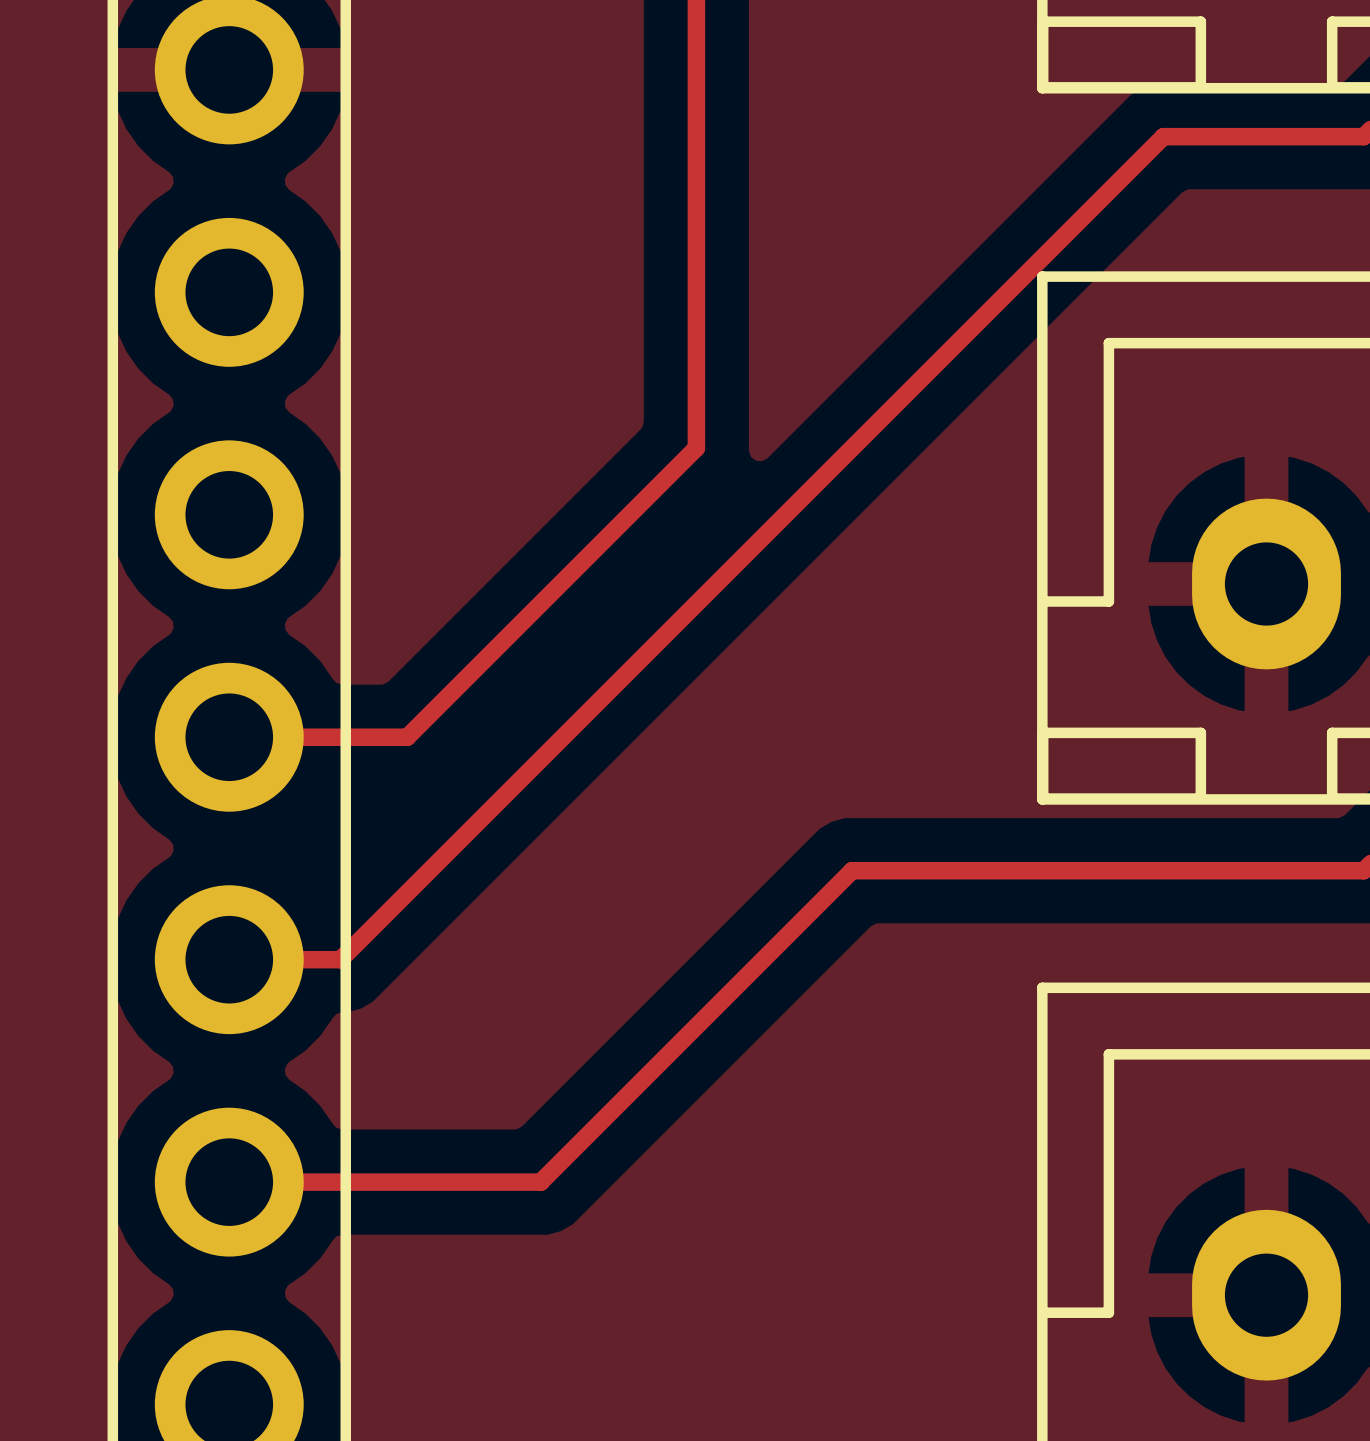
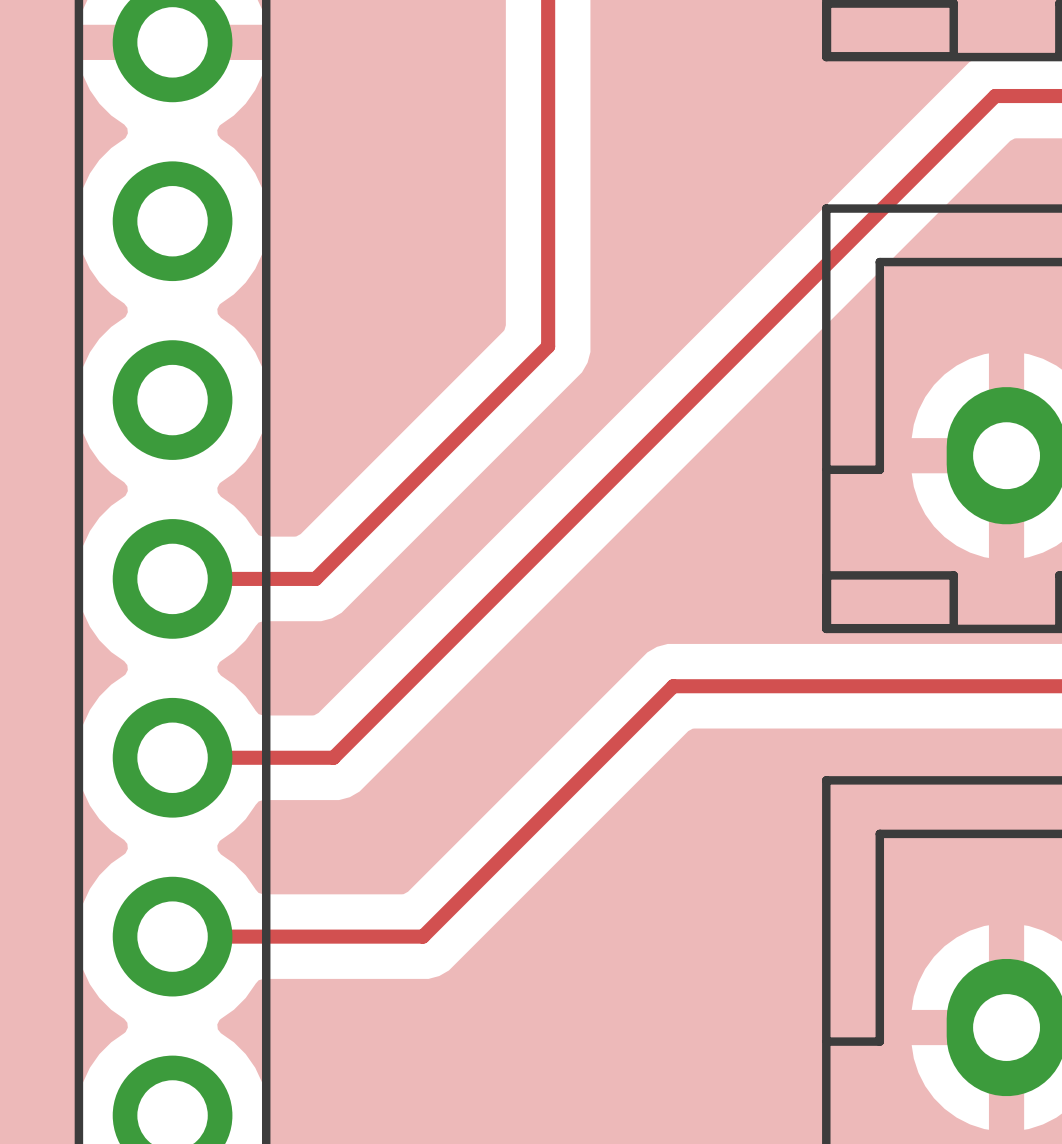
track: (1252, 136) (1163, 136) (340, 959) -> (995, 96) (333, 757) (261, 757)

